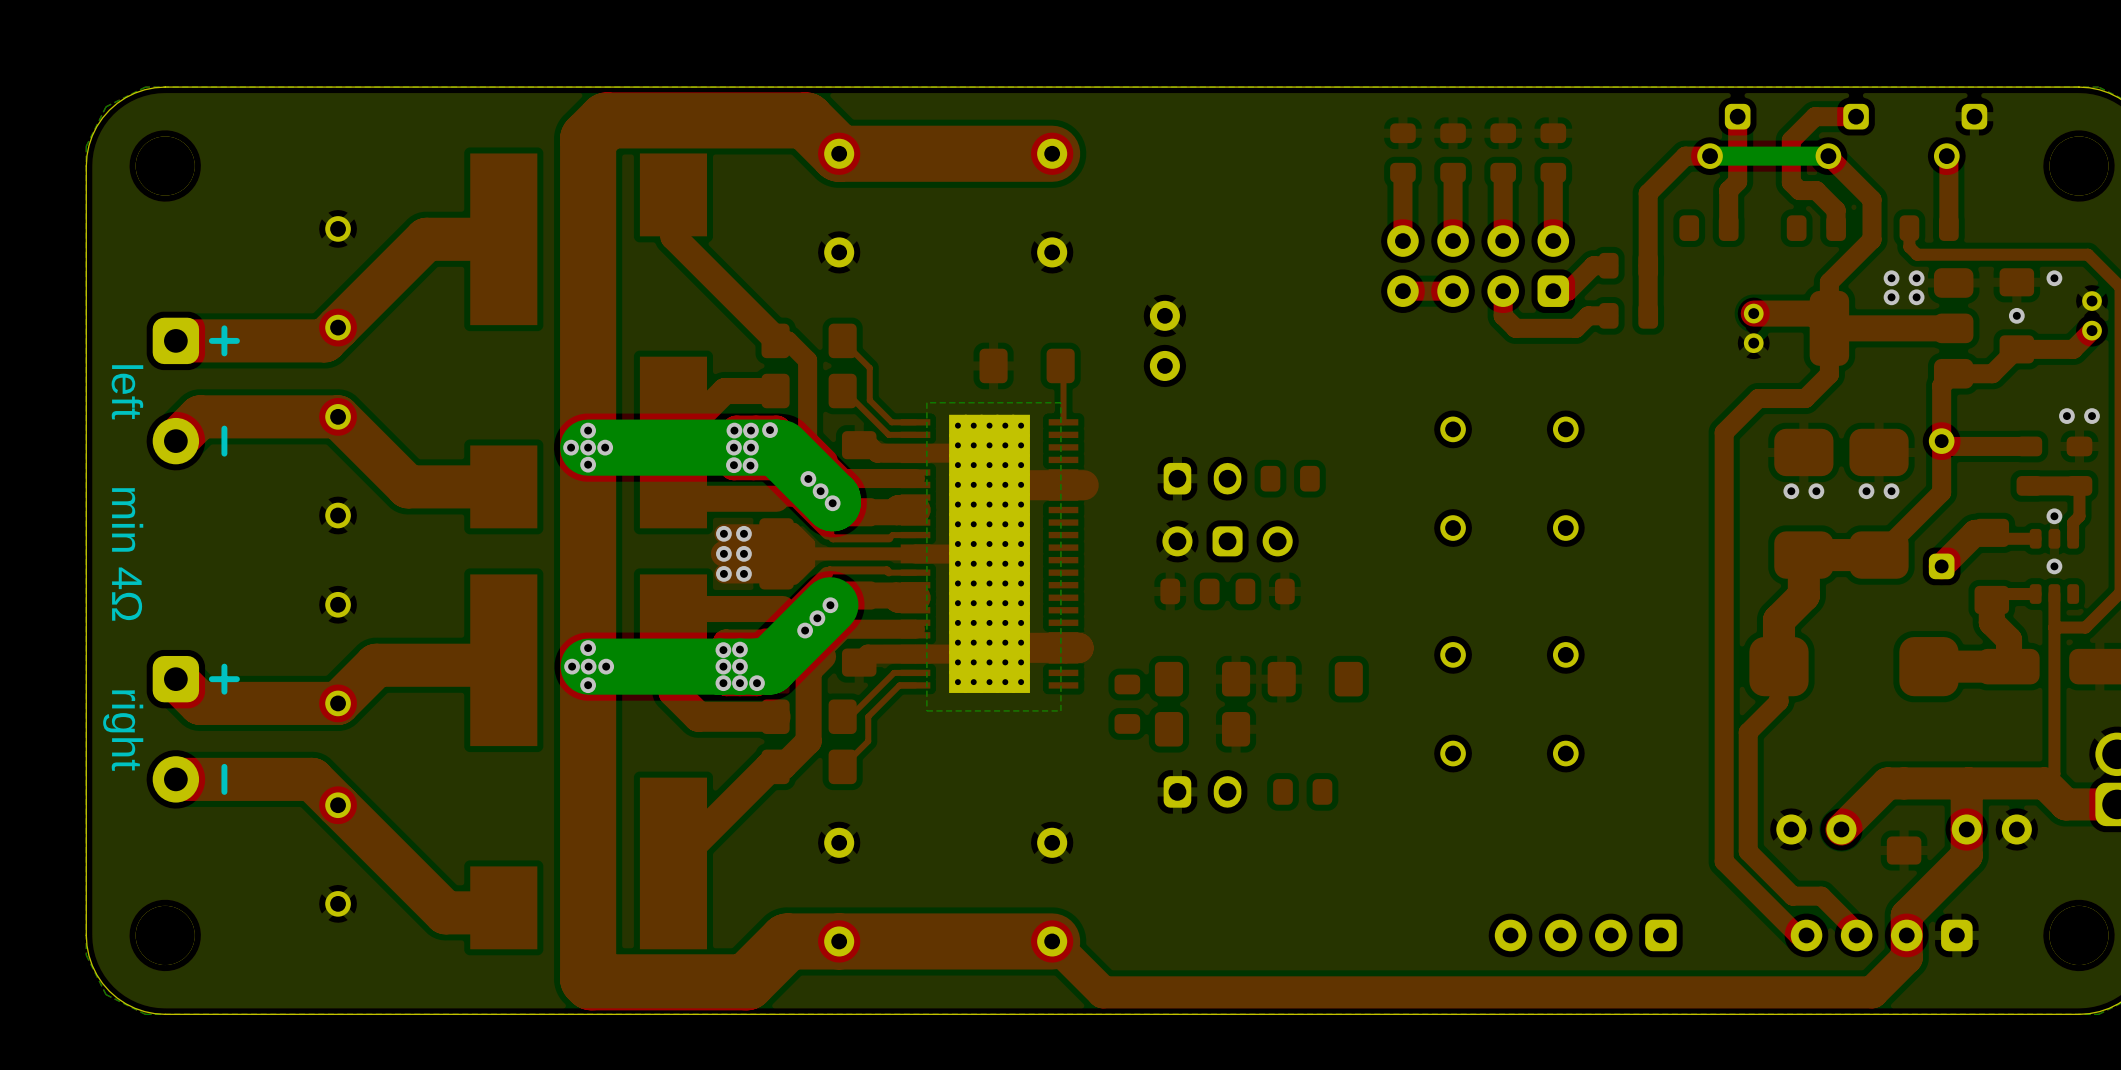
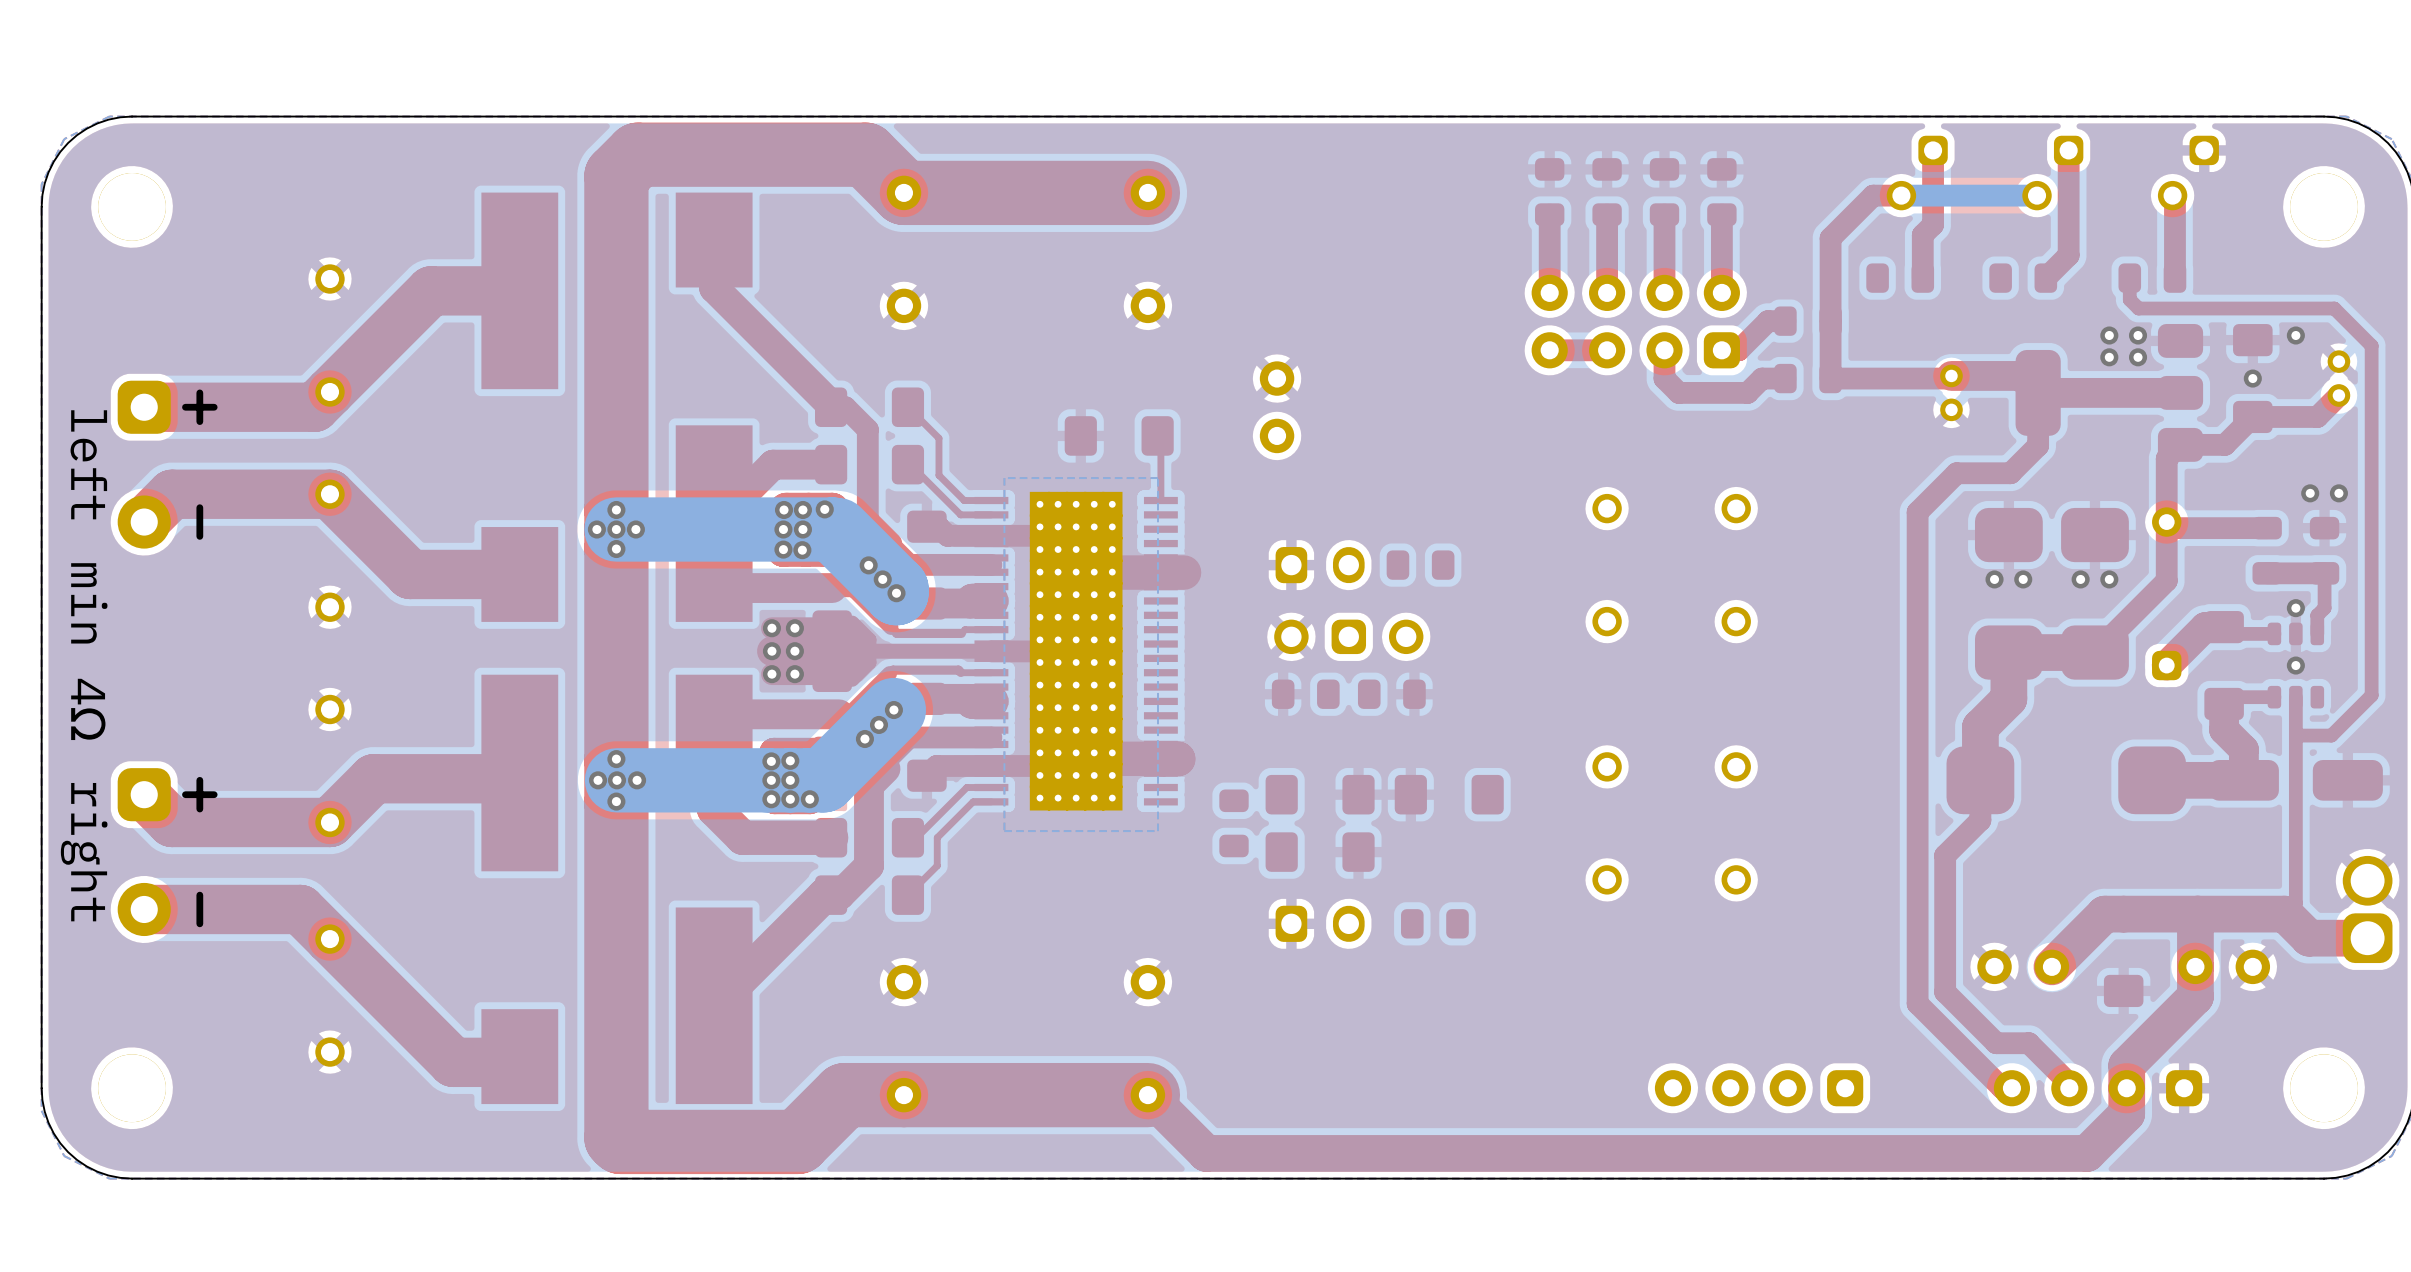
top track: (1856, 116) (1815, 116) (1791, 140) (1791, 182) (1799, 190) (1816, 190) (1836, 210) (1836, 228) -> (2068, 150) (2068, 255) (2045, 278)
top track: (1828, 156) (1872, 199) (1872, 239) (1829, 282) (1829, 328) -> none
top track: none -> (1951, 375) (1948, 378) (1830, 378)

